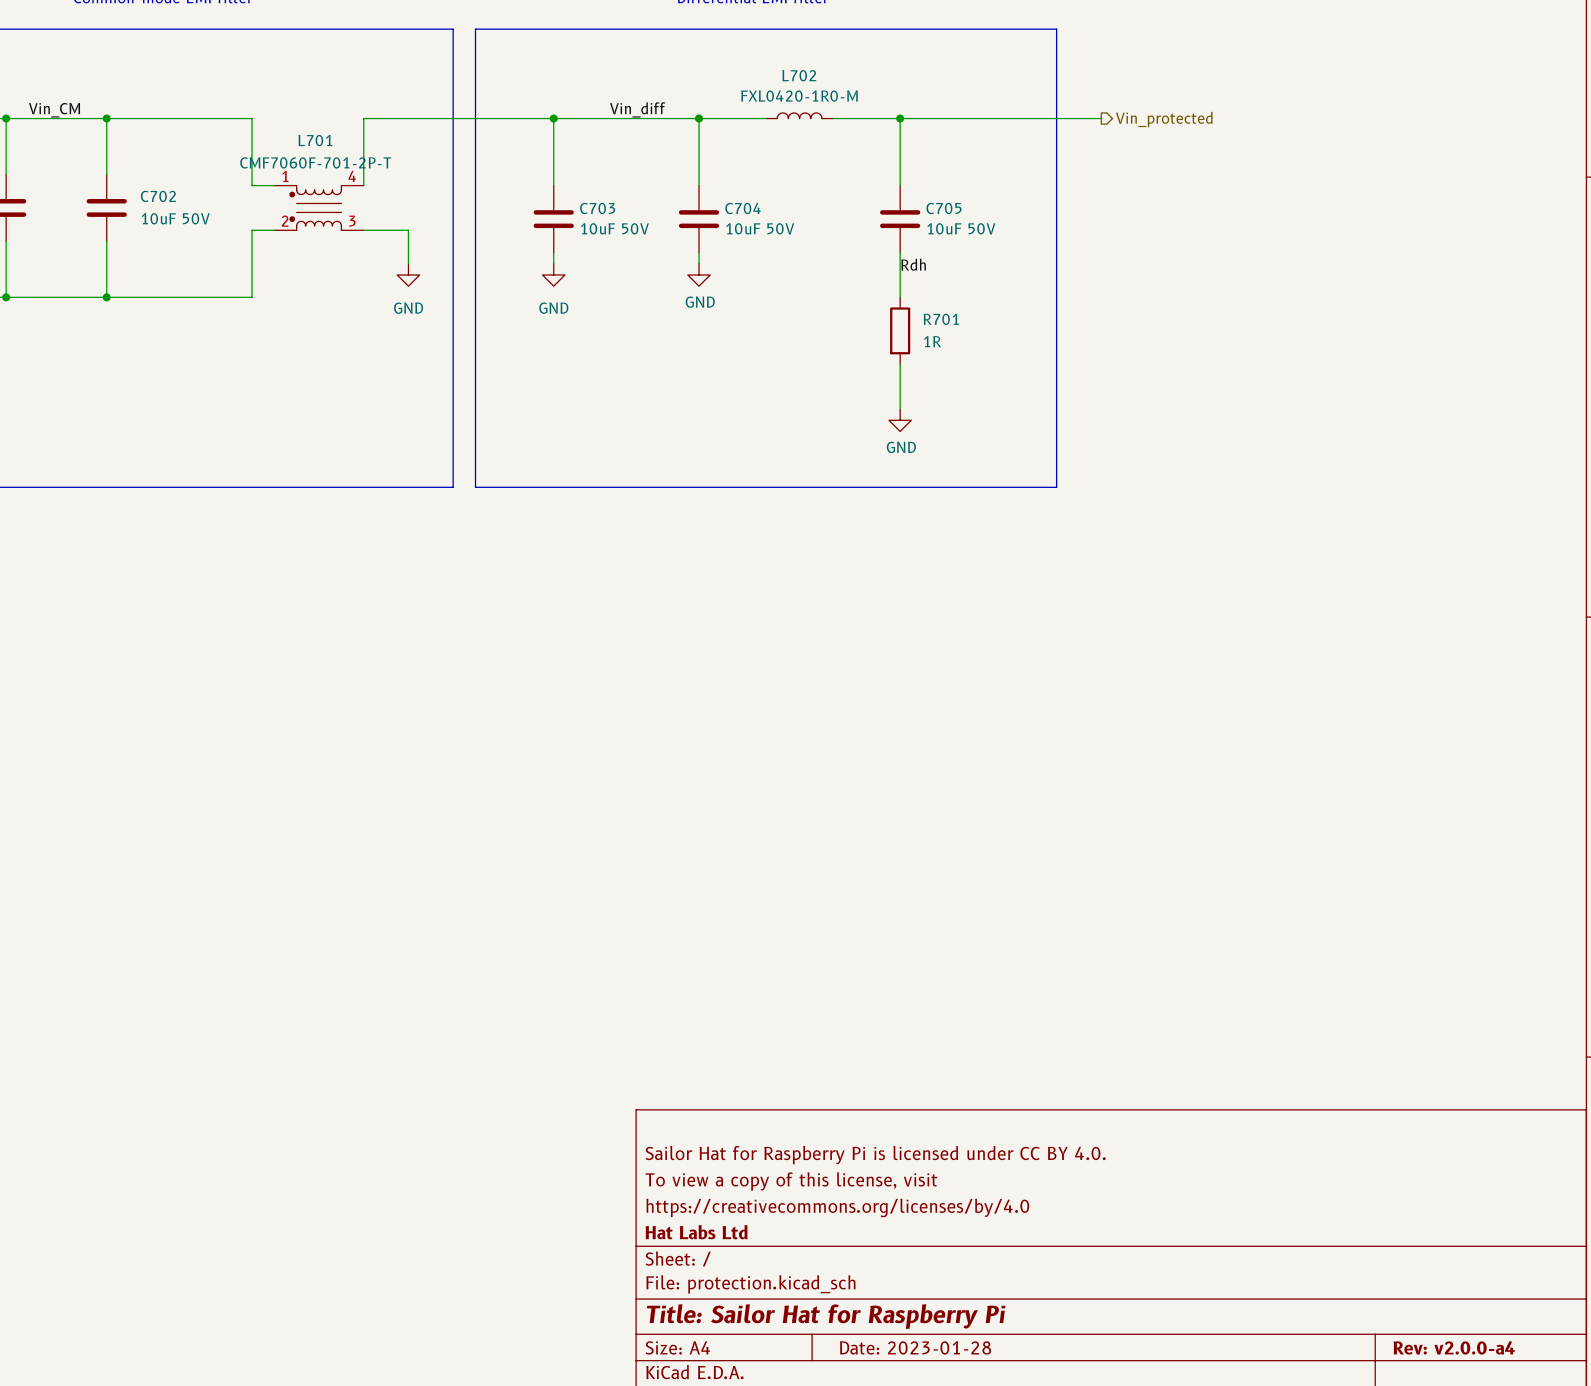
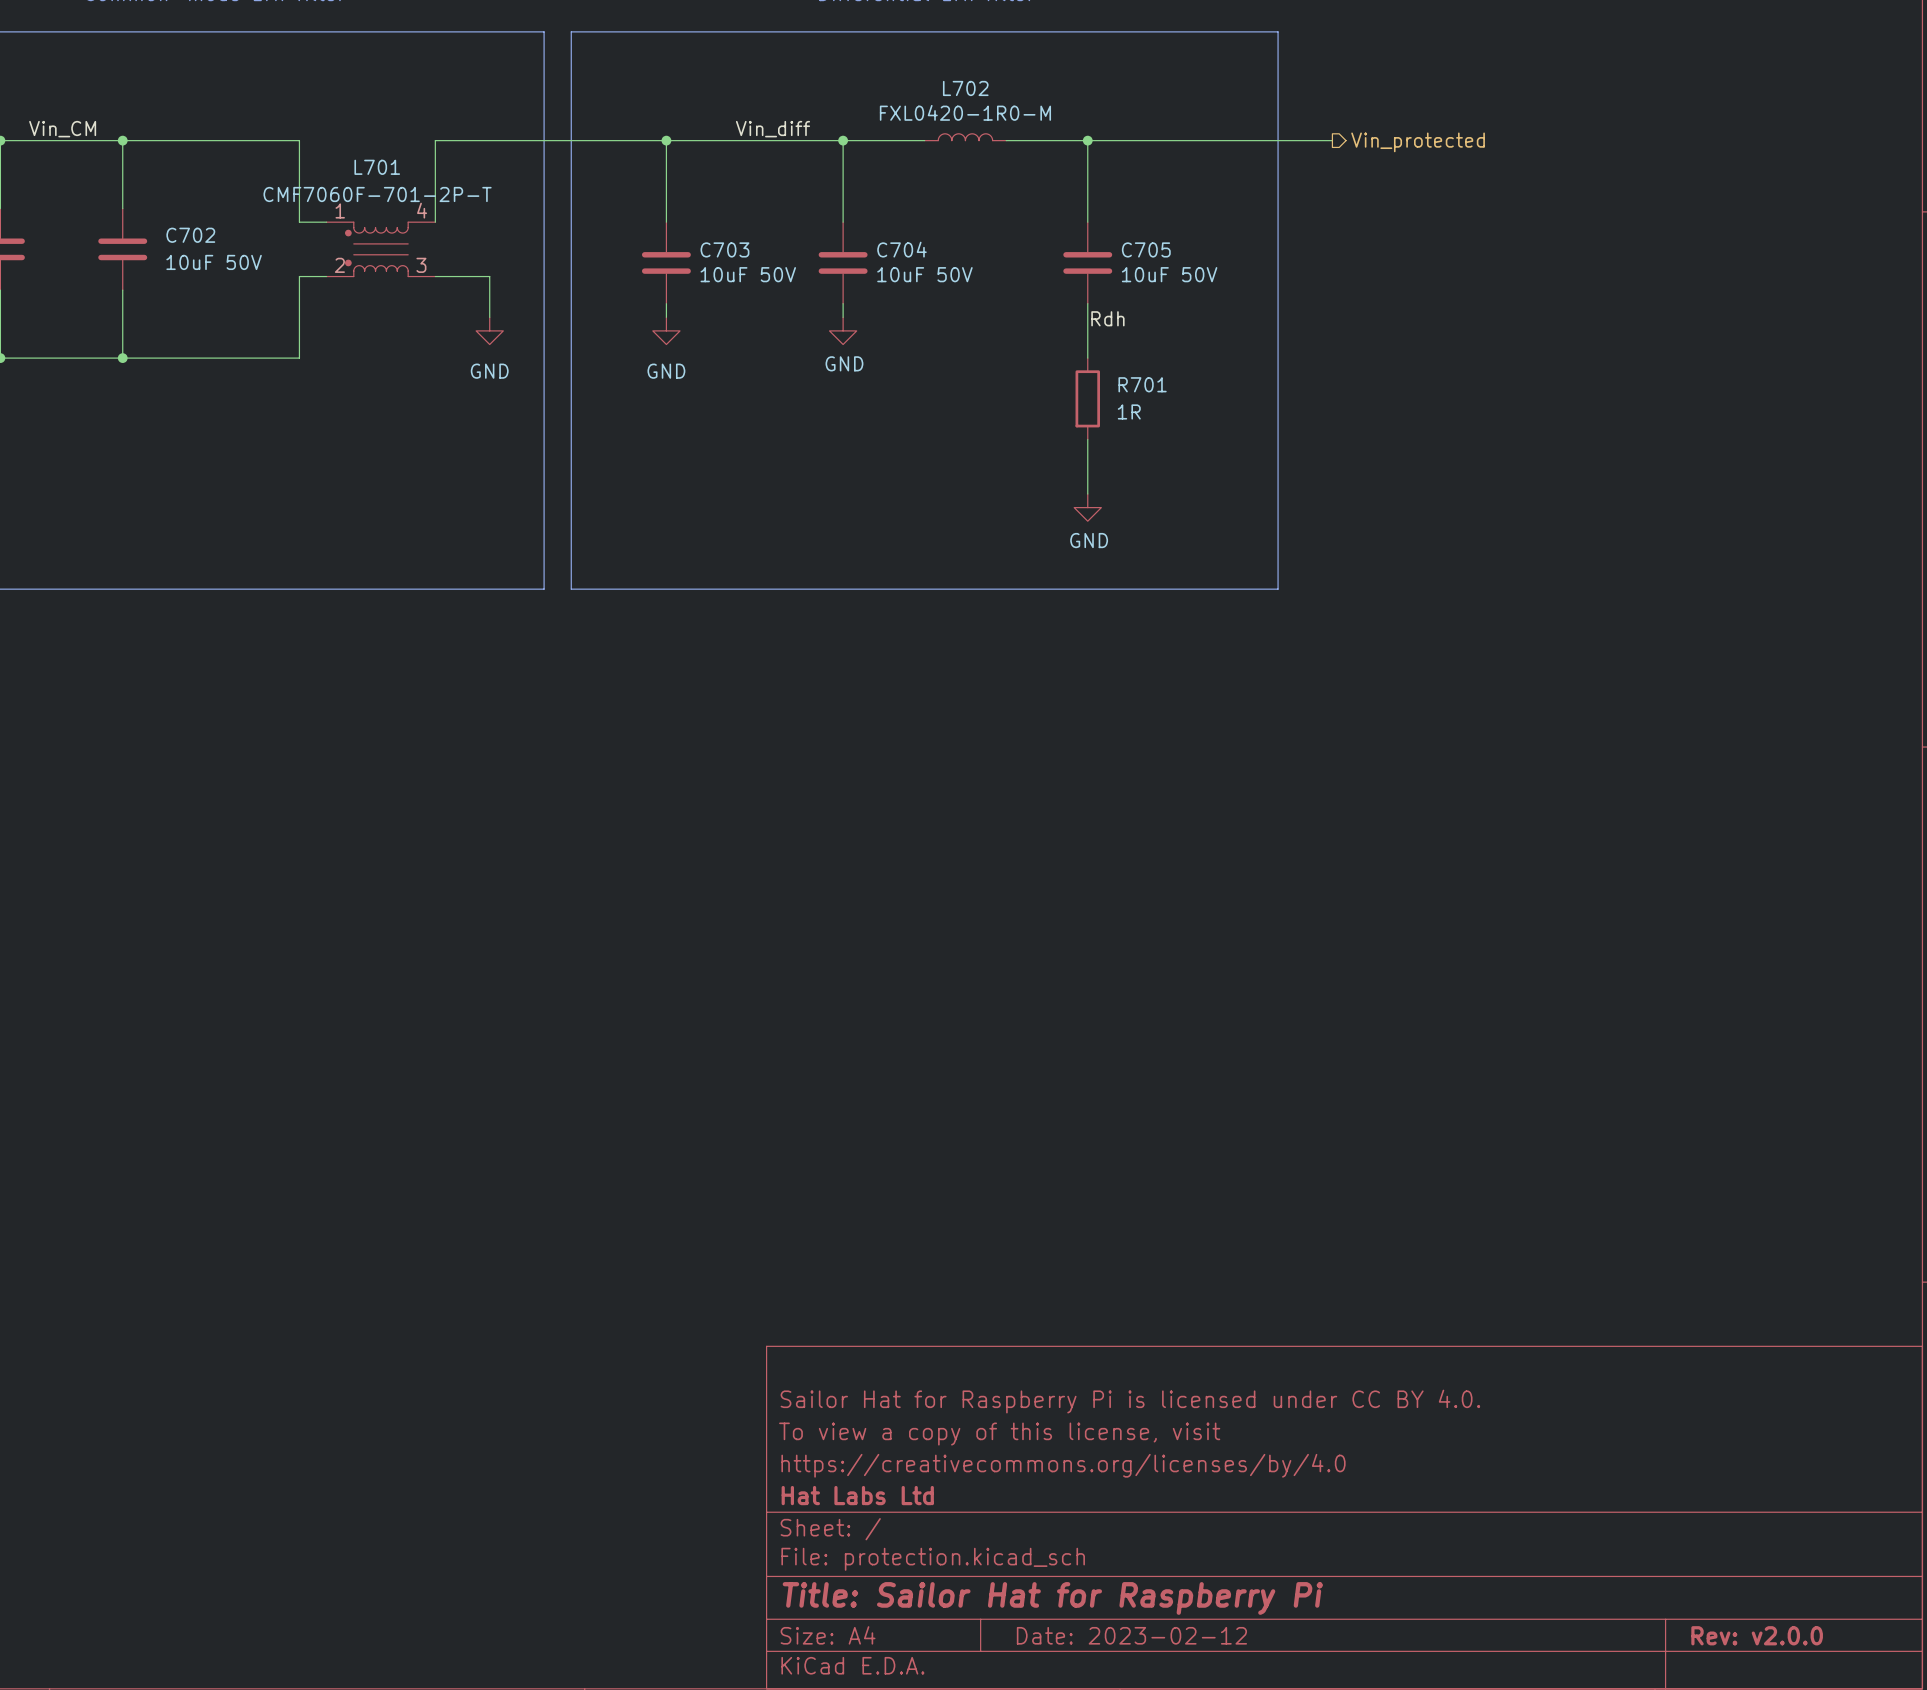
title block: Date: 2023-01-28 (915, 1347) -> Date: 2023-02-12 (1131, 1635)
title block: Rev: v2.0.0-a4 (1454, 1347) -> Rev: v2.0.0 (1757, 1635)

